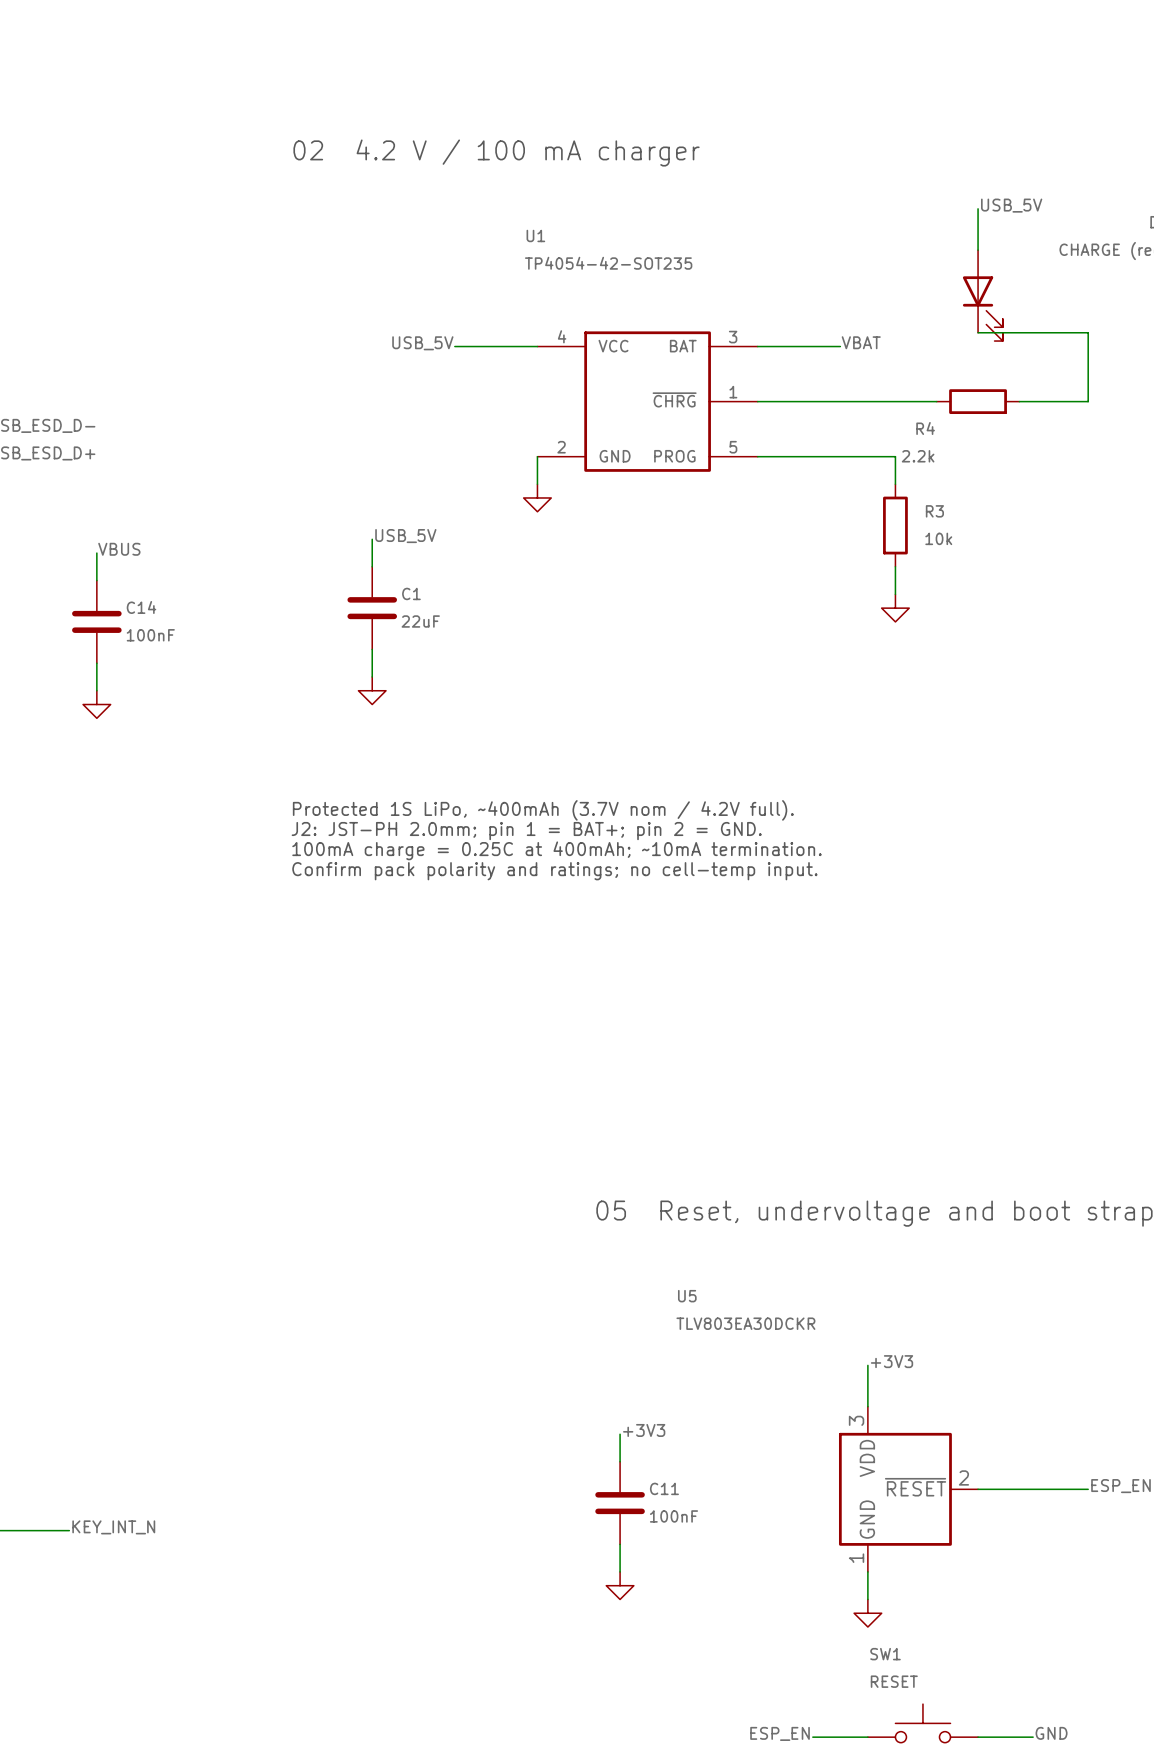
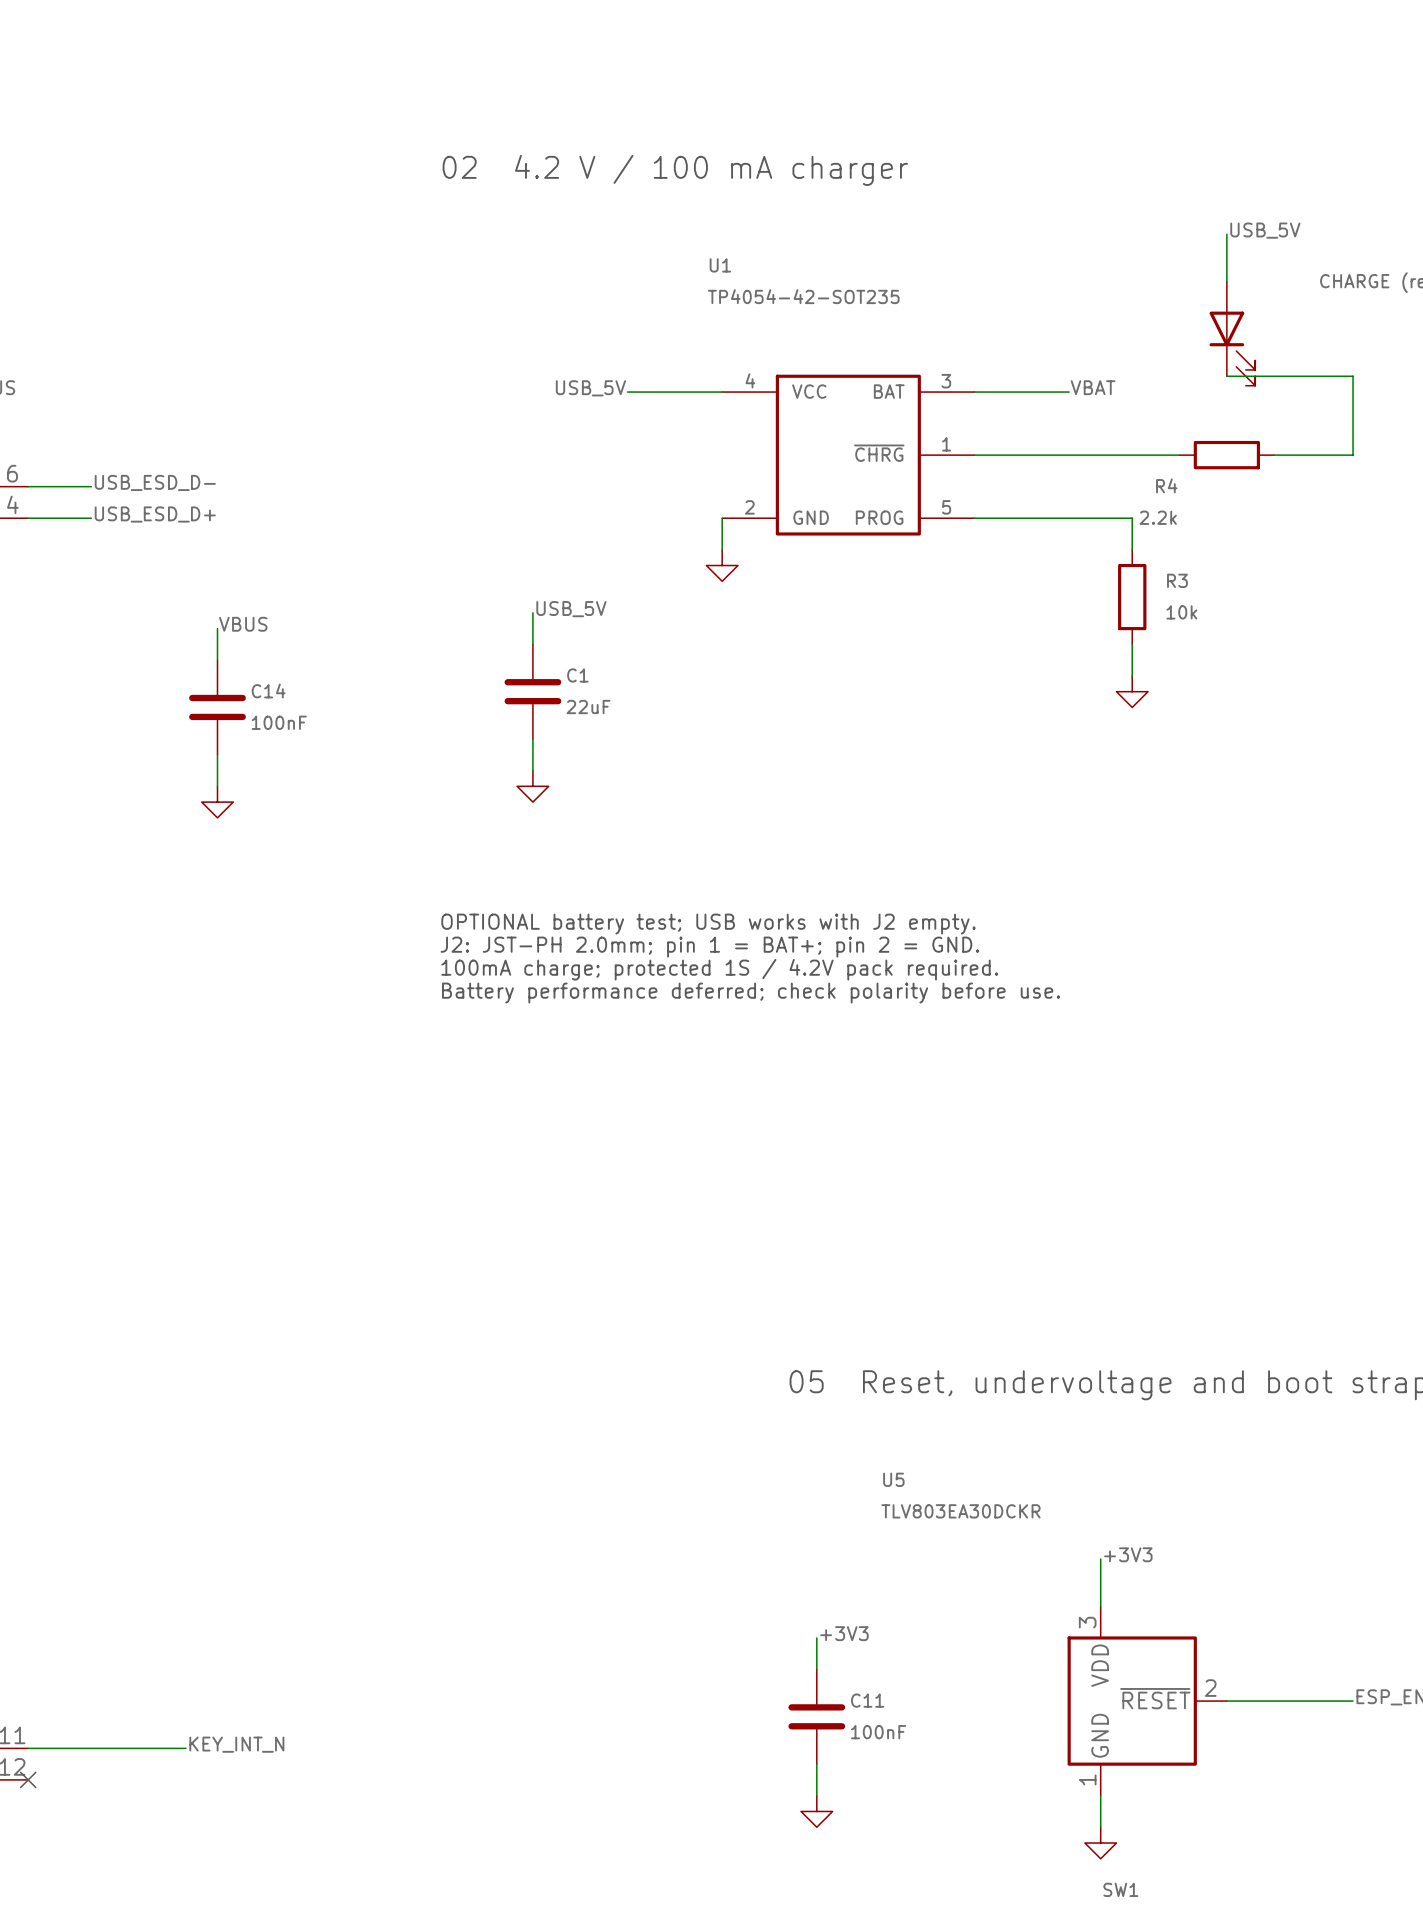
text: Protected 1S LiPo, ~400mAh (3.7V nom / 4.2V full). (543, 810) -> OPTIONAL battery test; USB works with J2 empty. (708, 924)
text: 100mA charge = 0.25C at 400mAh; ~10mA termination. (556, 850) -> 100mA charge; protected 1S / 4.2V pack required. (719, 969)
text: Confirm pack polarity and ratings; no cell-temp input. (554, 871) -> Battery performance deferred; check polarity before use. (751, 993)

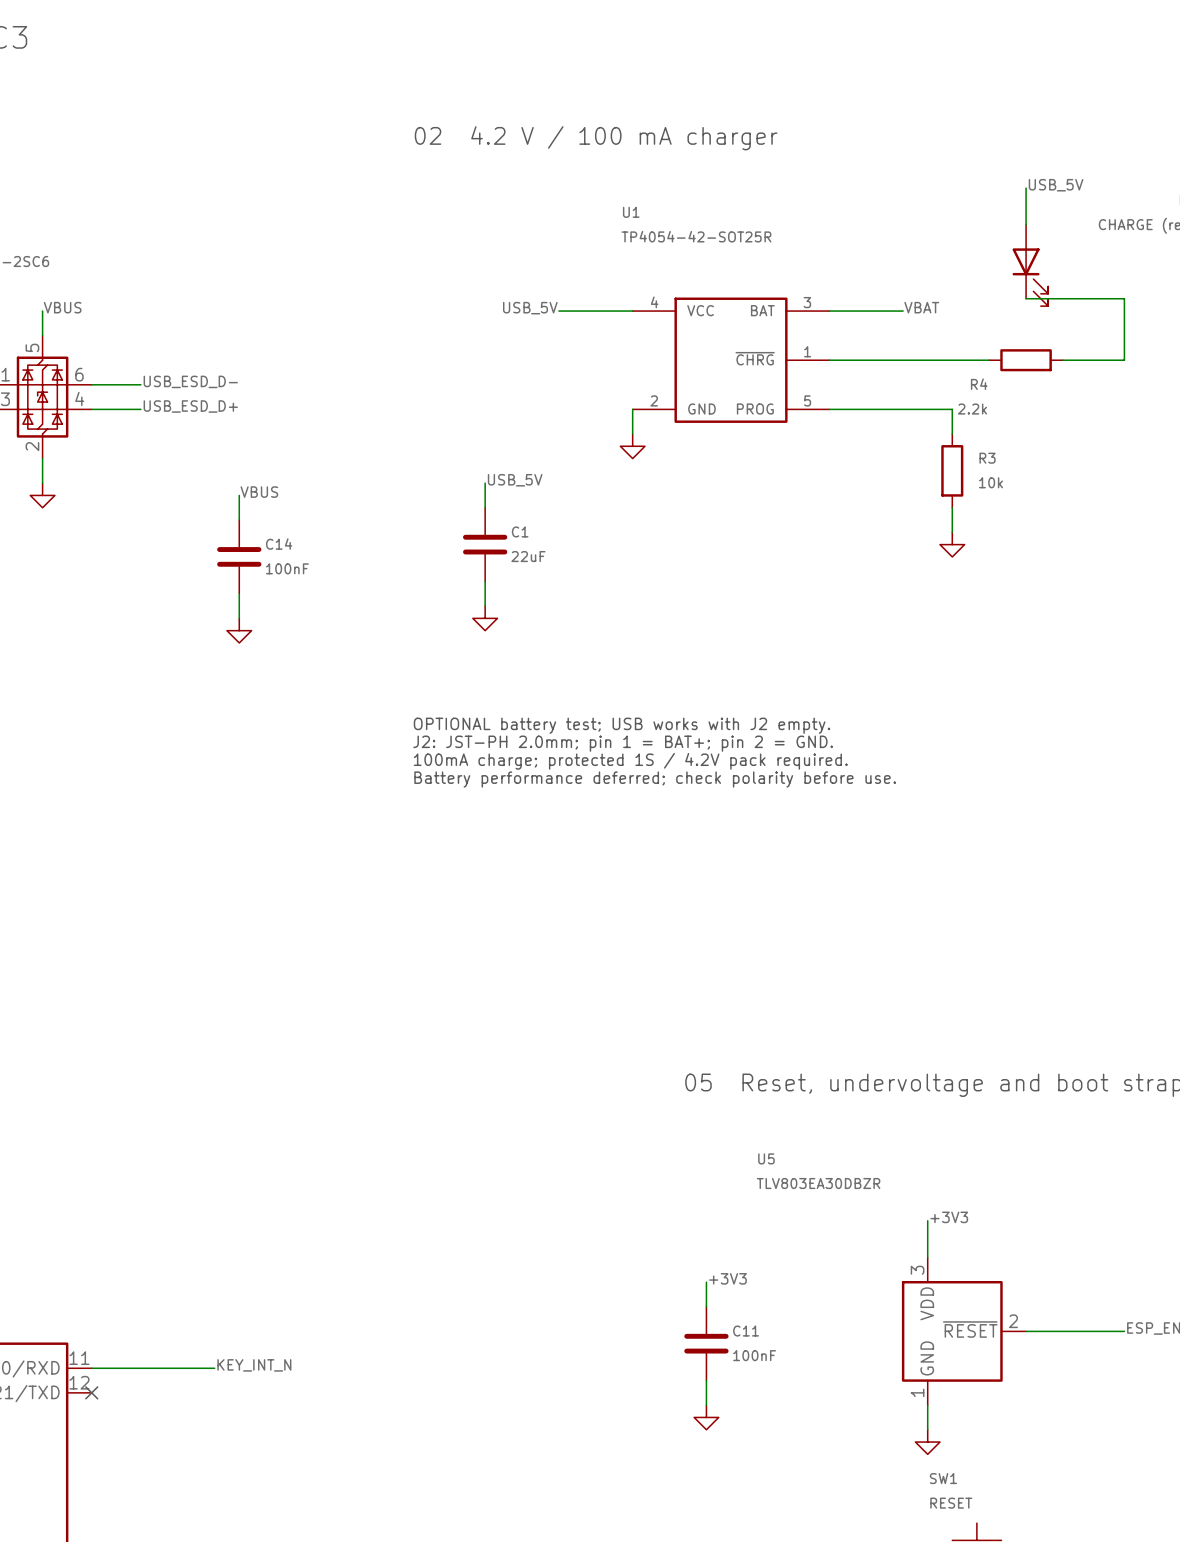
U1 value: TP4054-42-SOT235 (803, 296) -> TP4054-42-SOT25R (696, 236)
U5 value: TLV803EA30DCKR (960, 1511) -> TLV803EA30DBZR (818, 1183)

